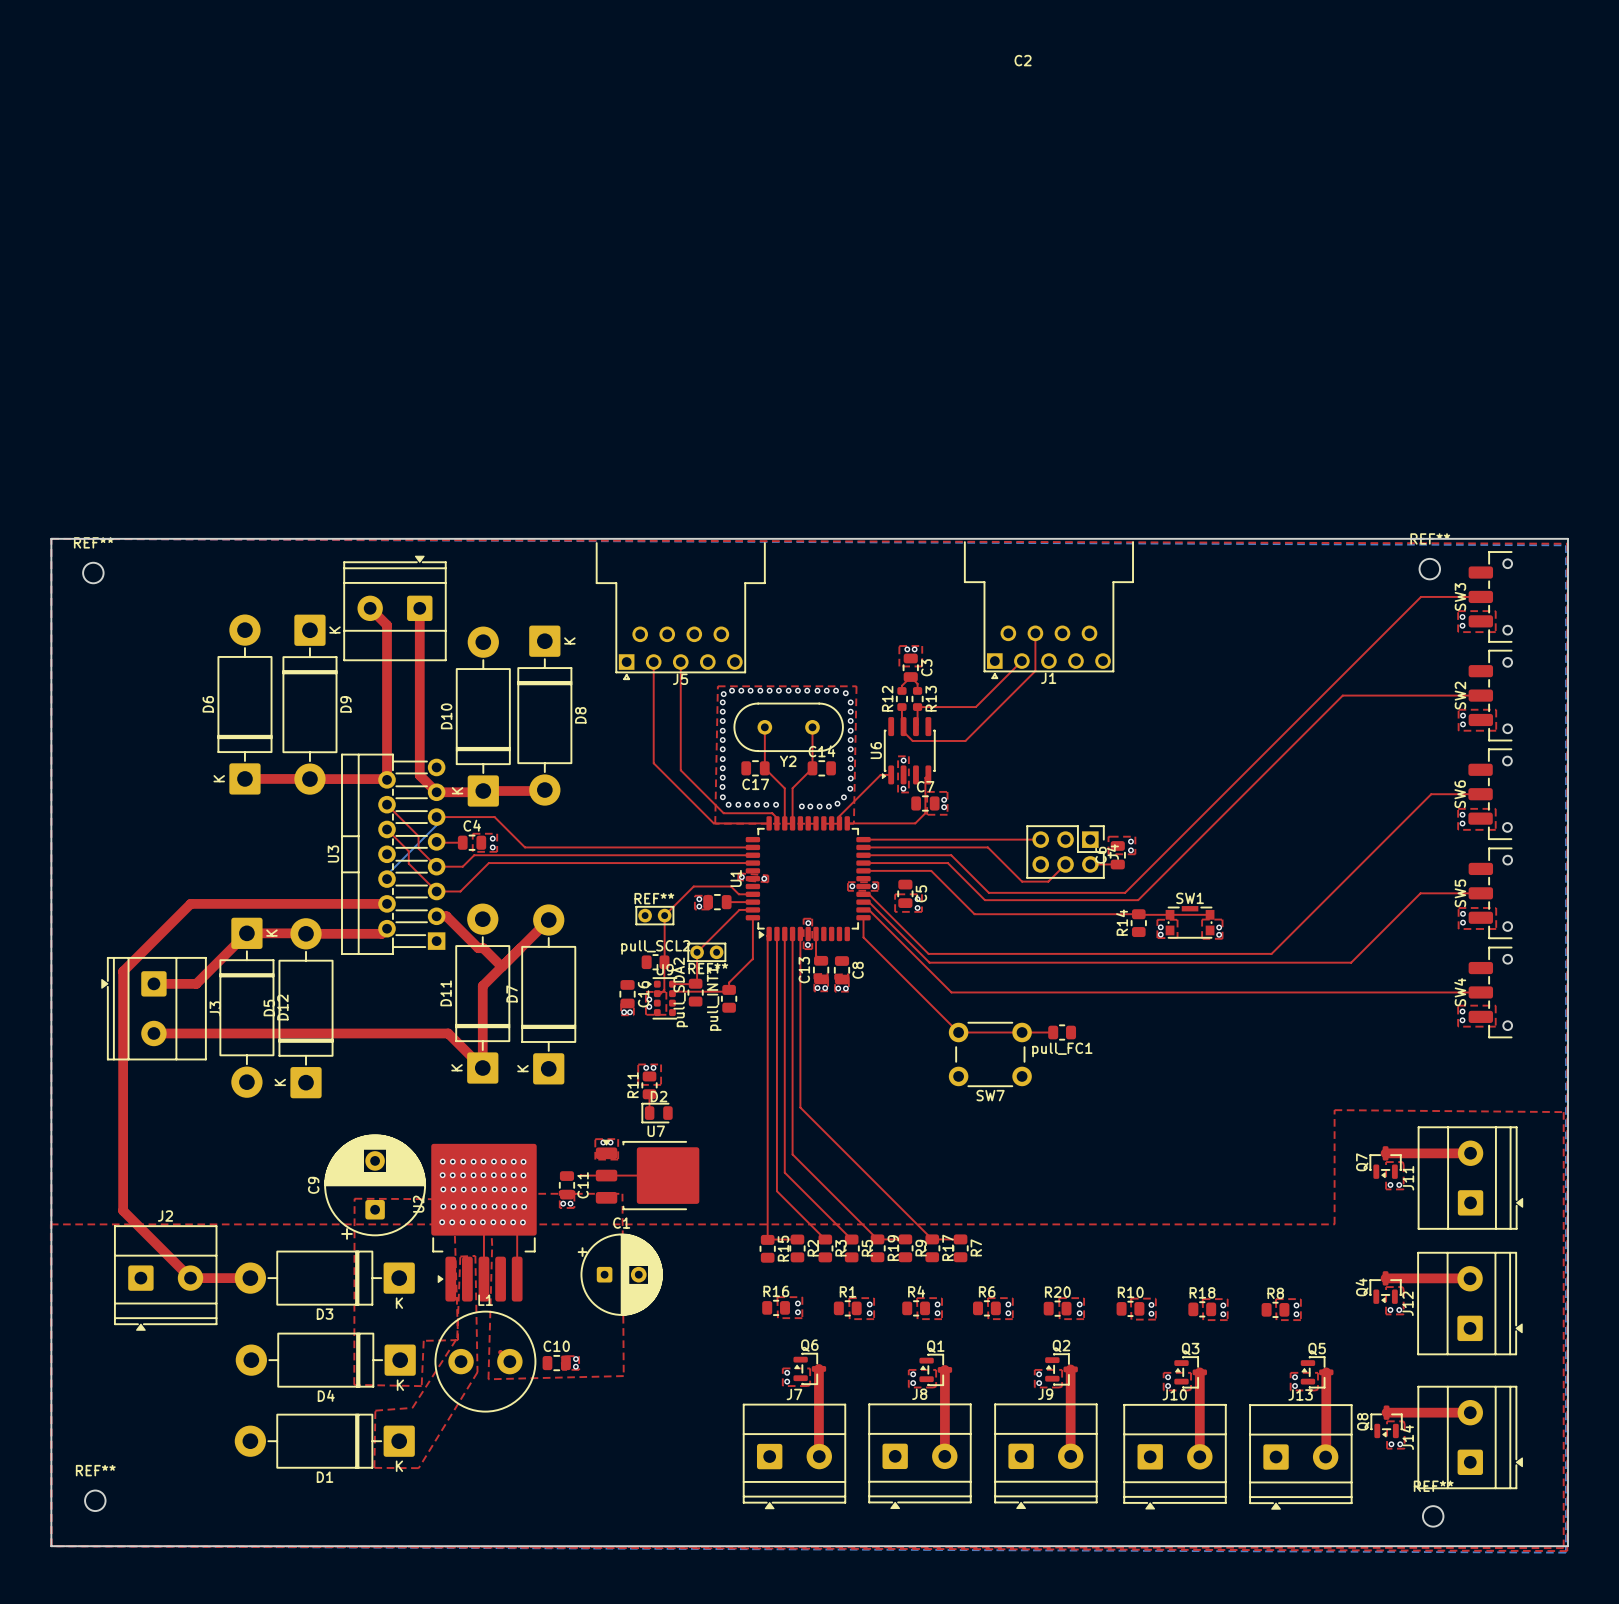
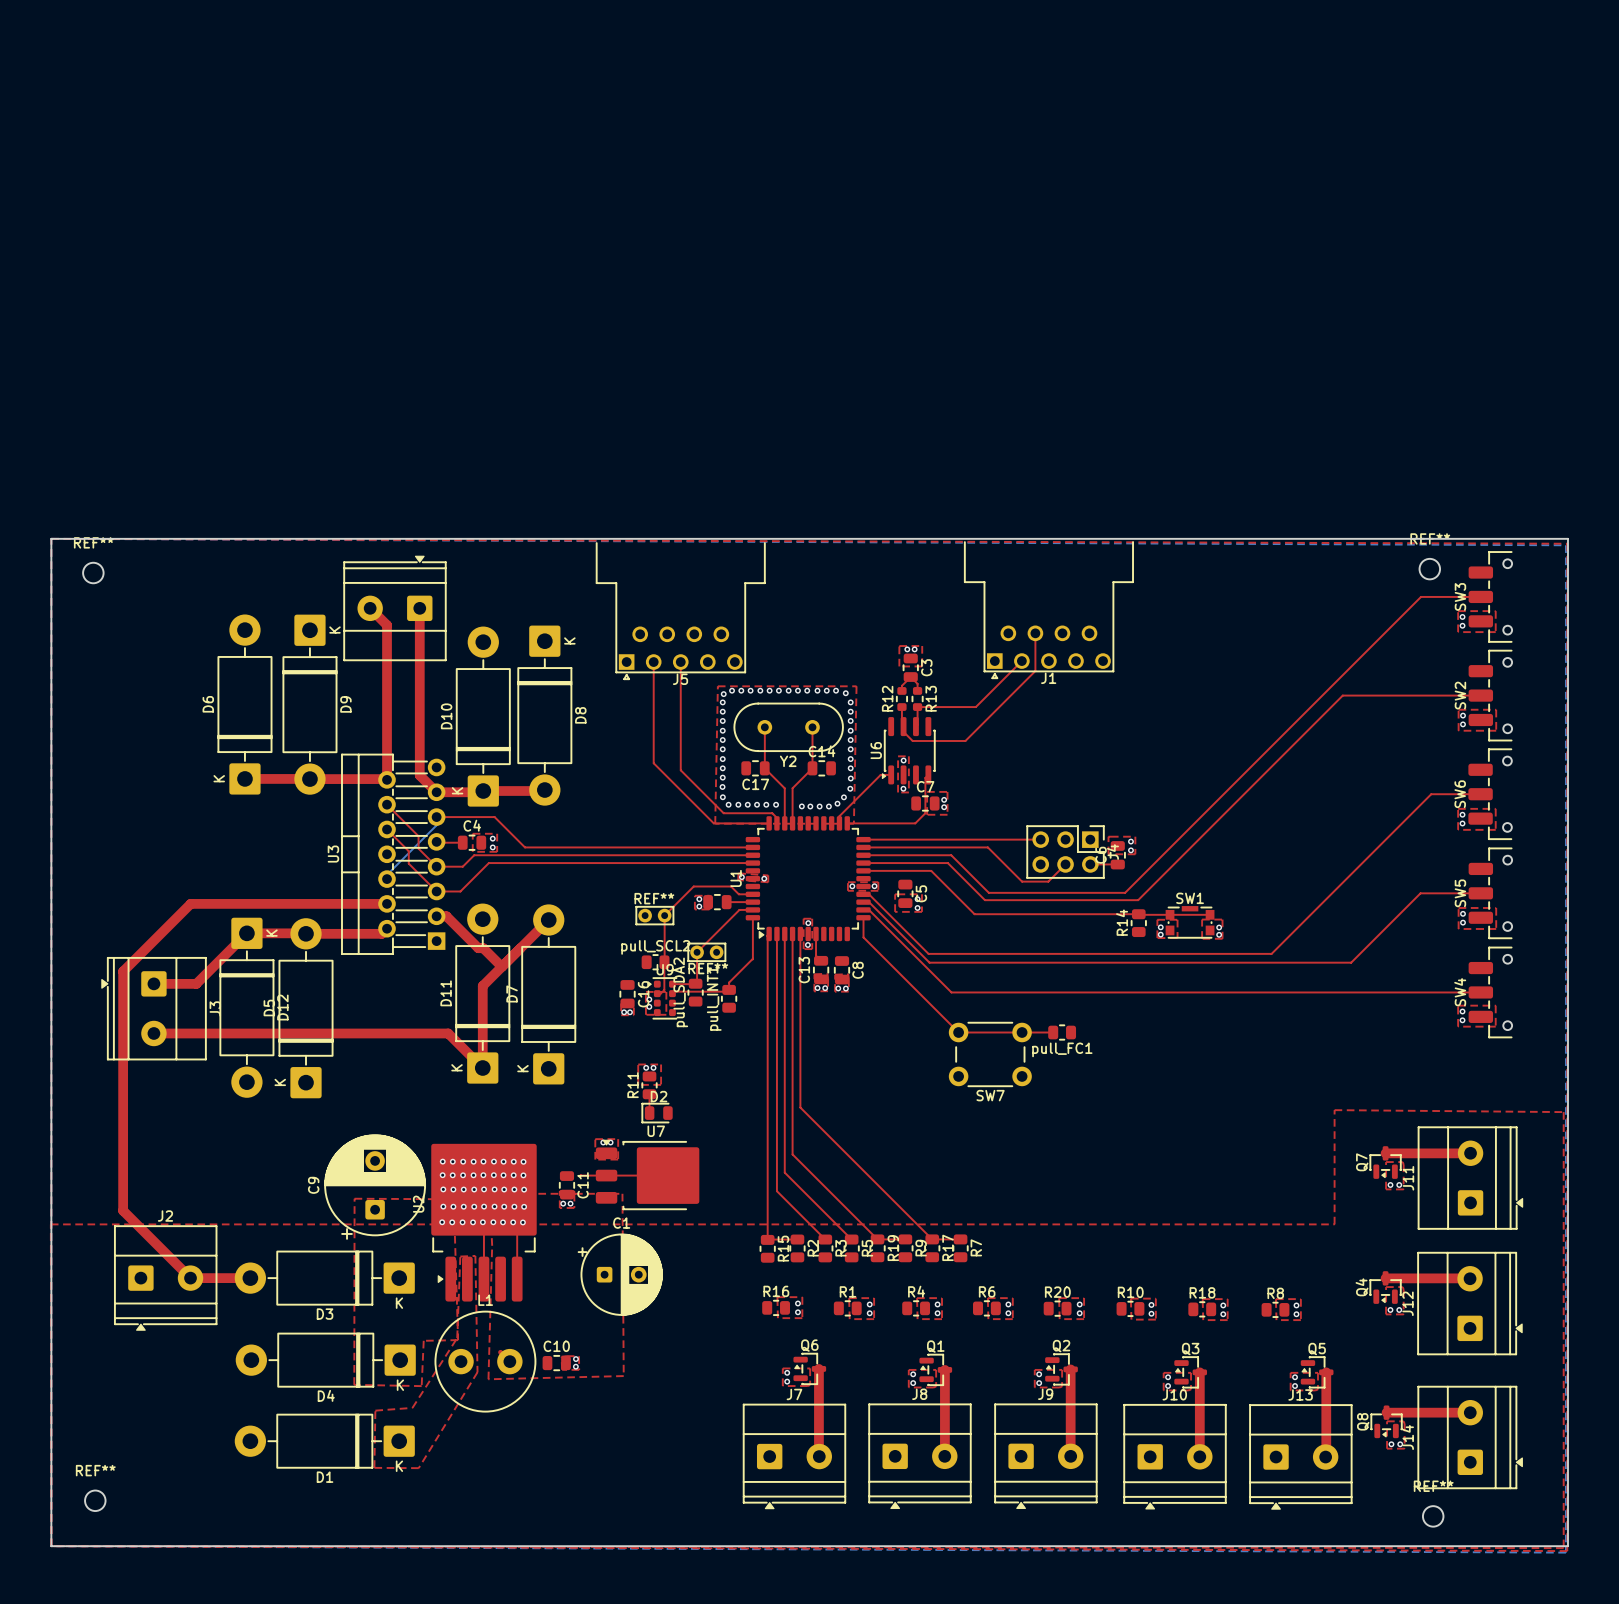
text: C2 (1023, 60) -> none

